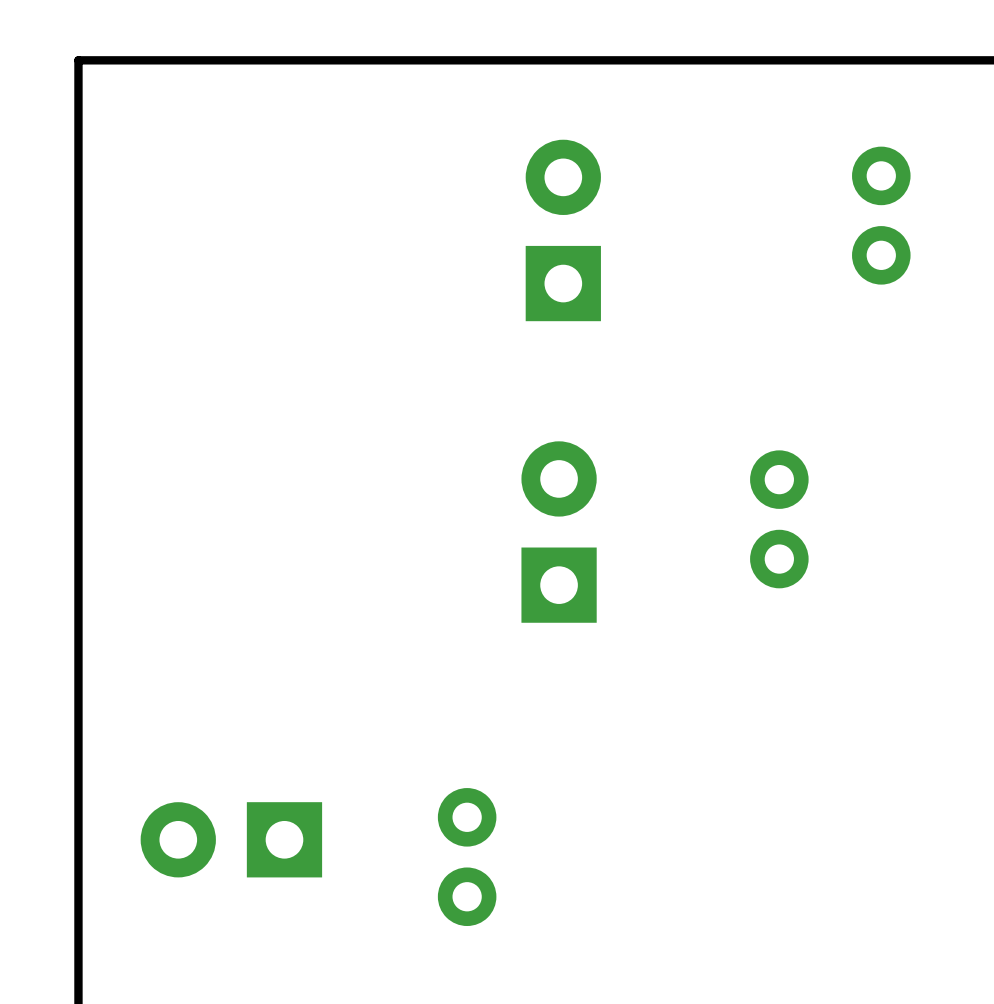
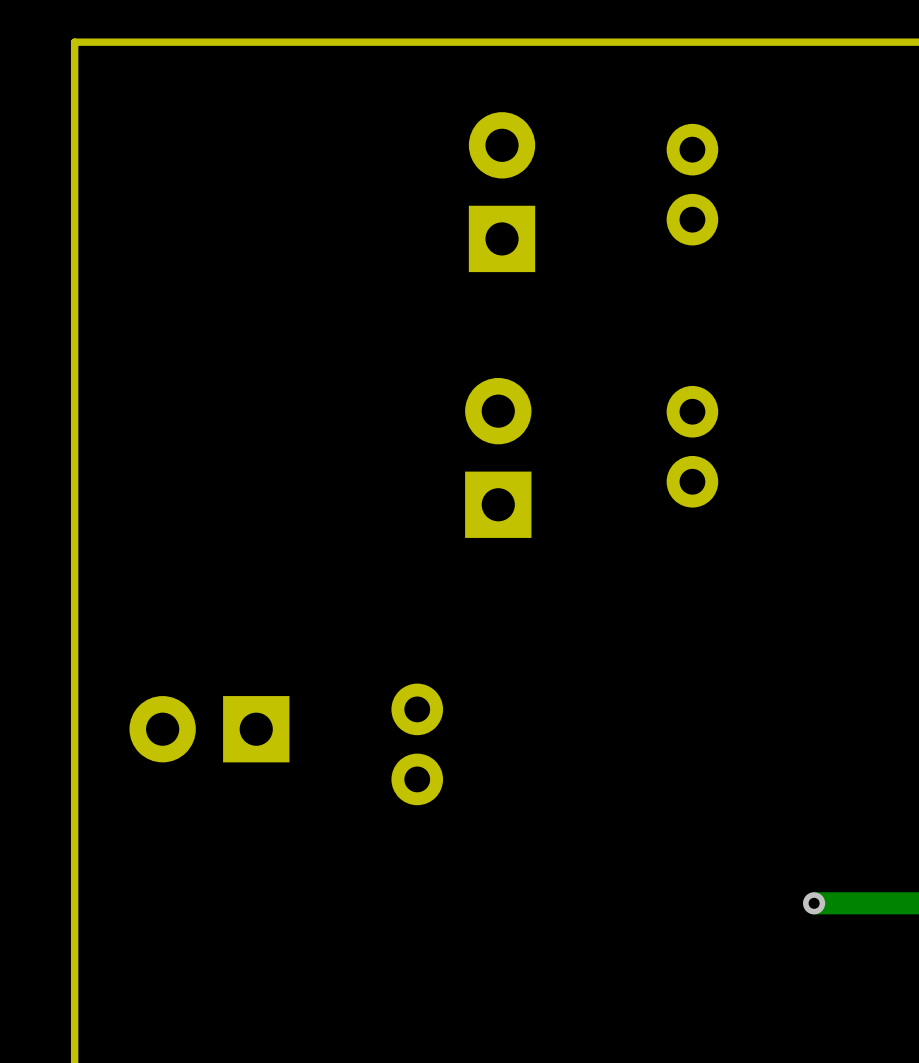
part position: (881, 215) -> (692, 184)

